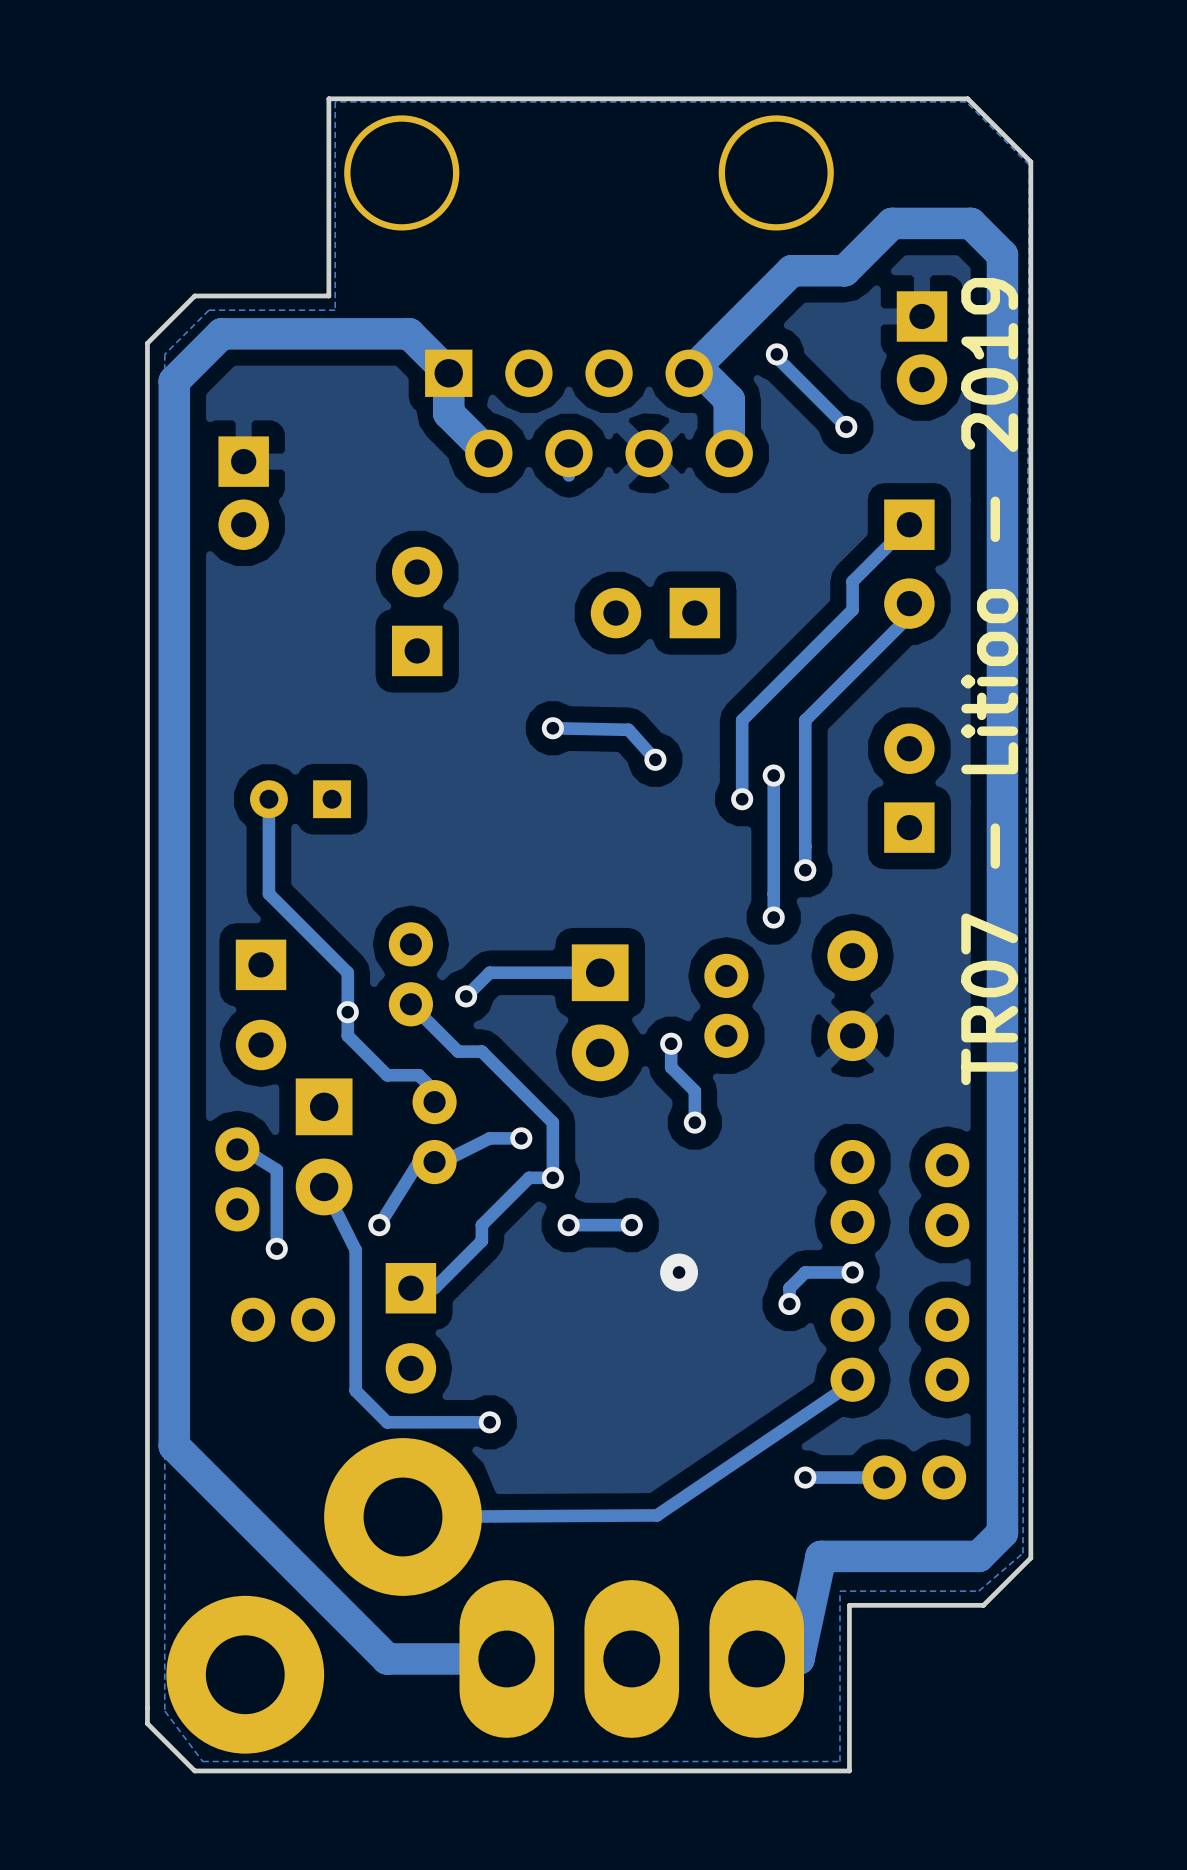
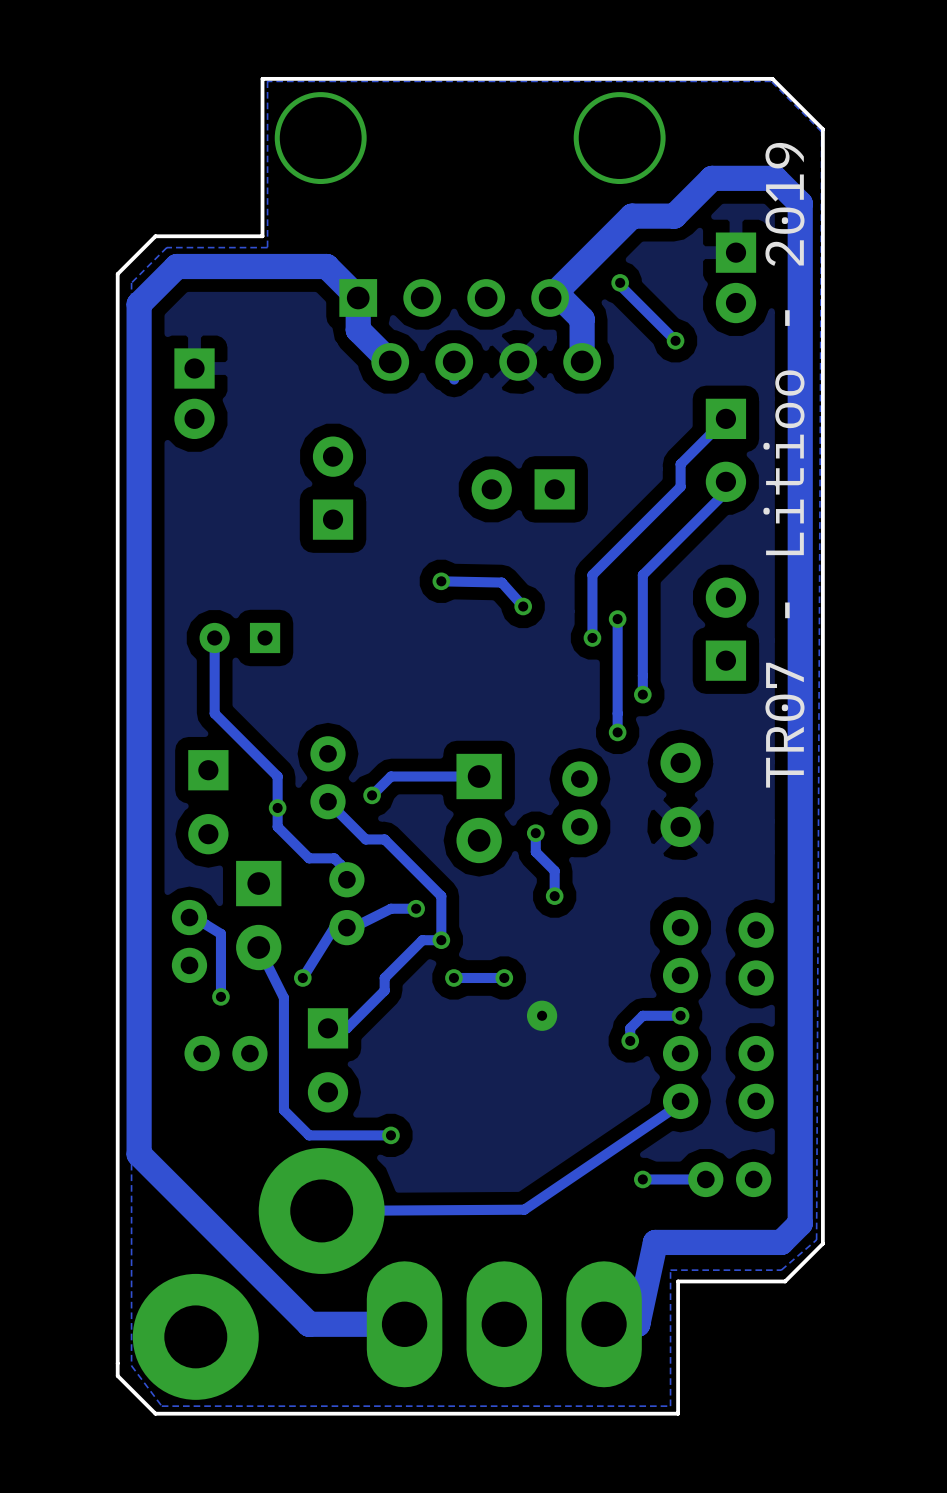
text position: TR07 - Litioo - 2019 (989, 681) -> TR07 - Litioo - 2019 (783, 465)

